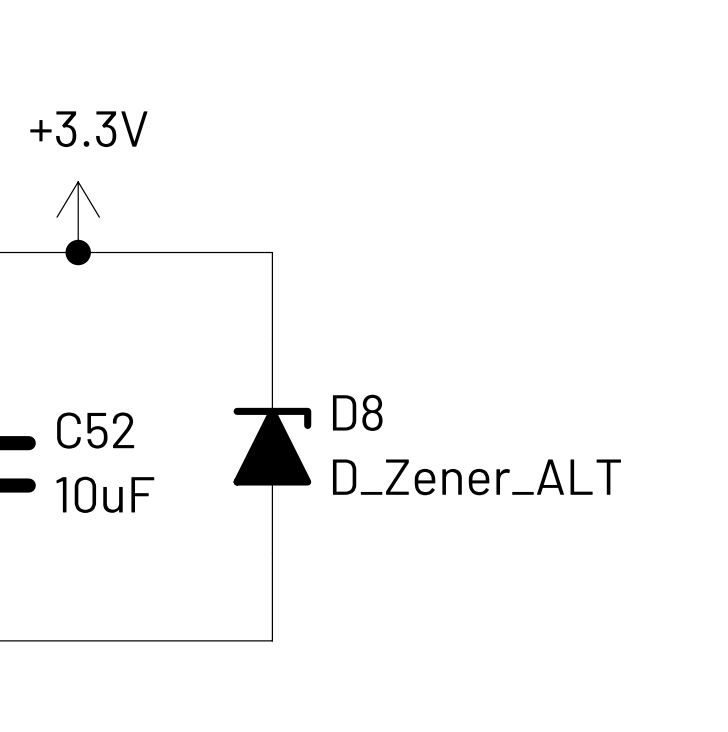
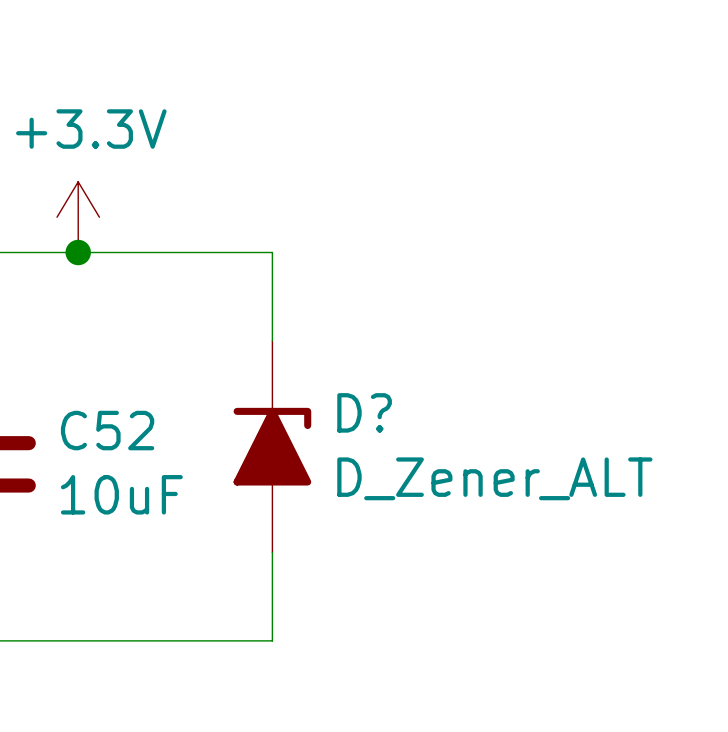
D8 name: D8 (357, 412) -> D? (364, 412)

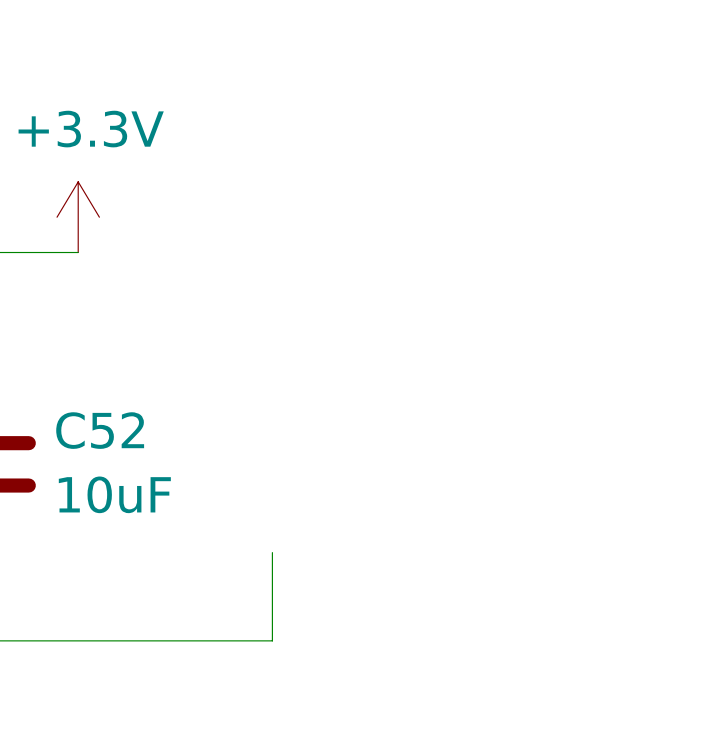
wire: (78, 252) (272, 252) (272, 340) -> none
junction: (78, 252) -> none
D?: D_Zener_ALT (272, 446) -> none

